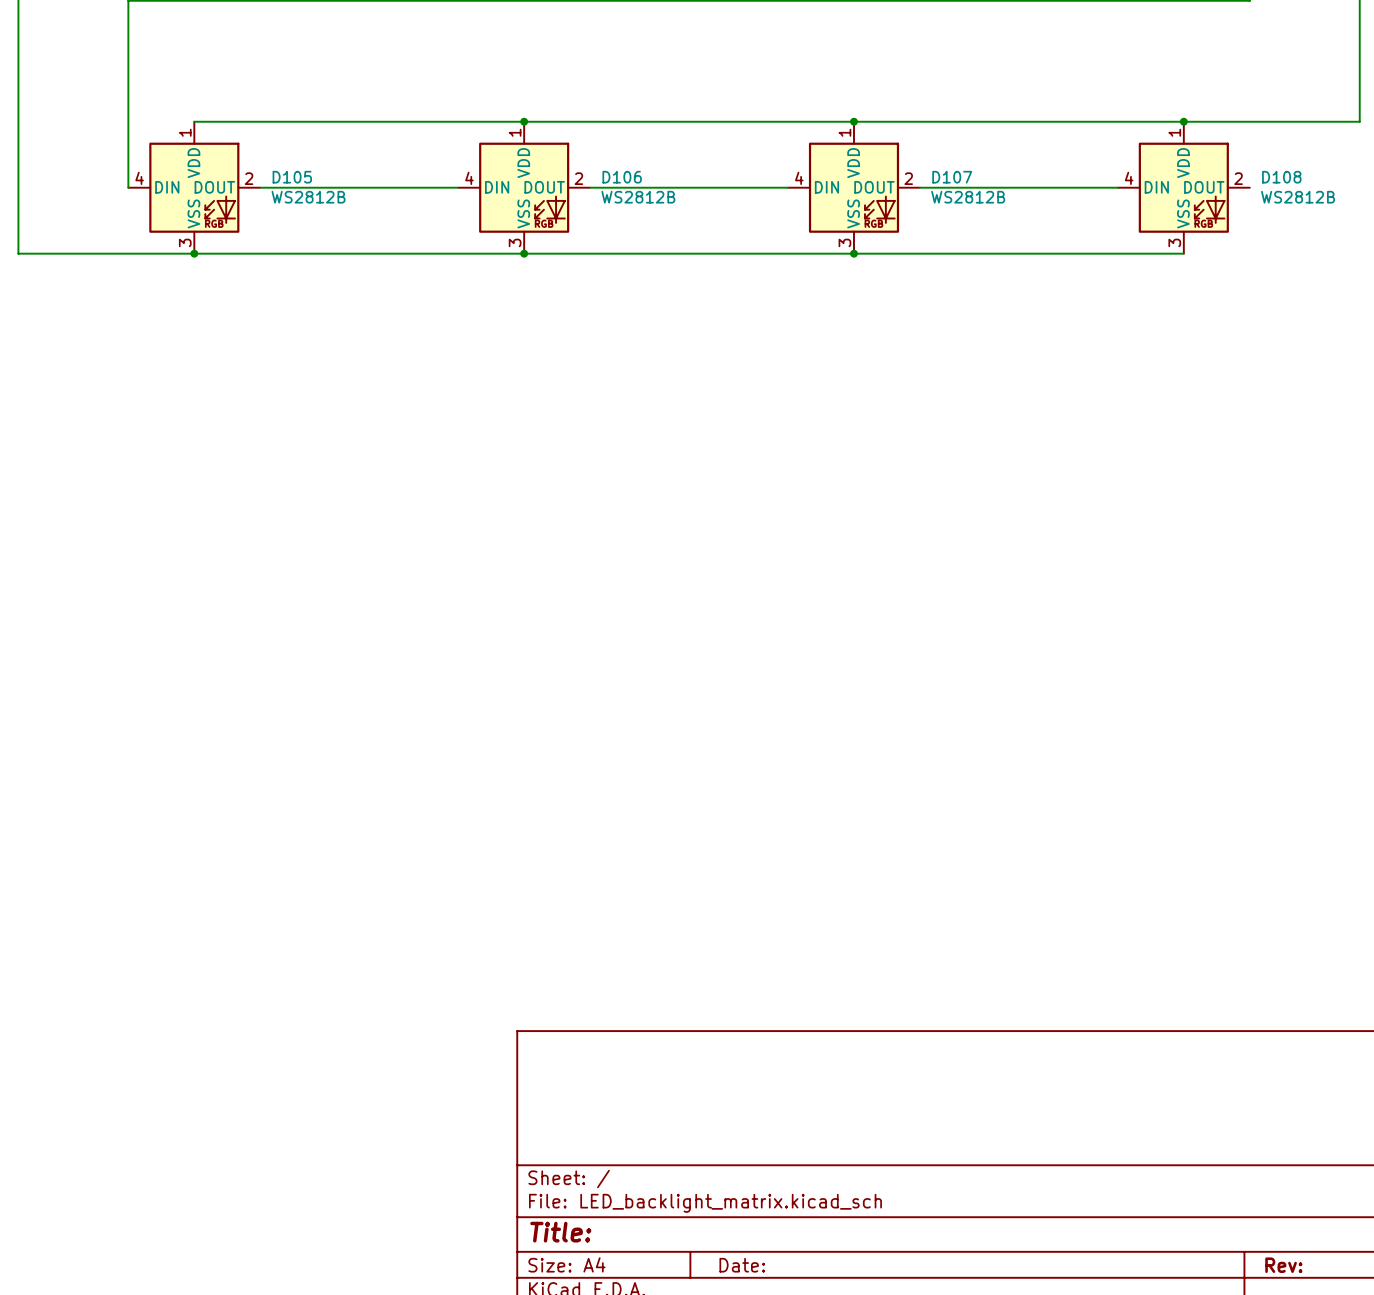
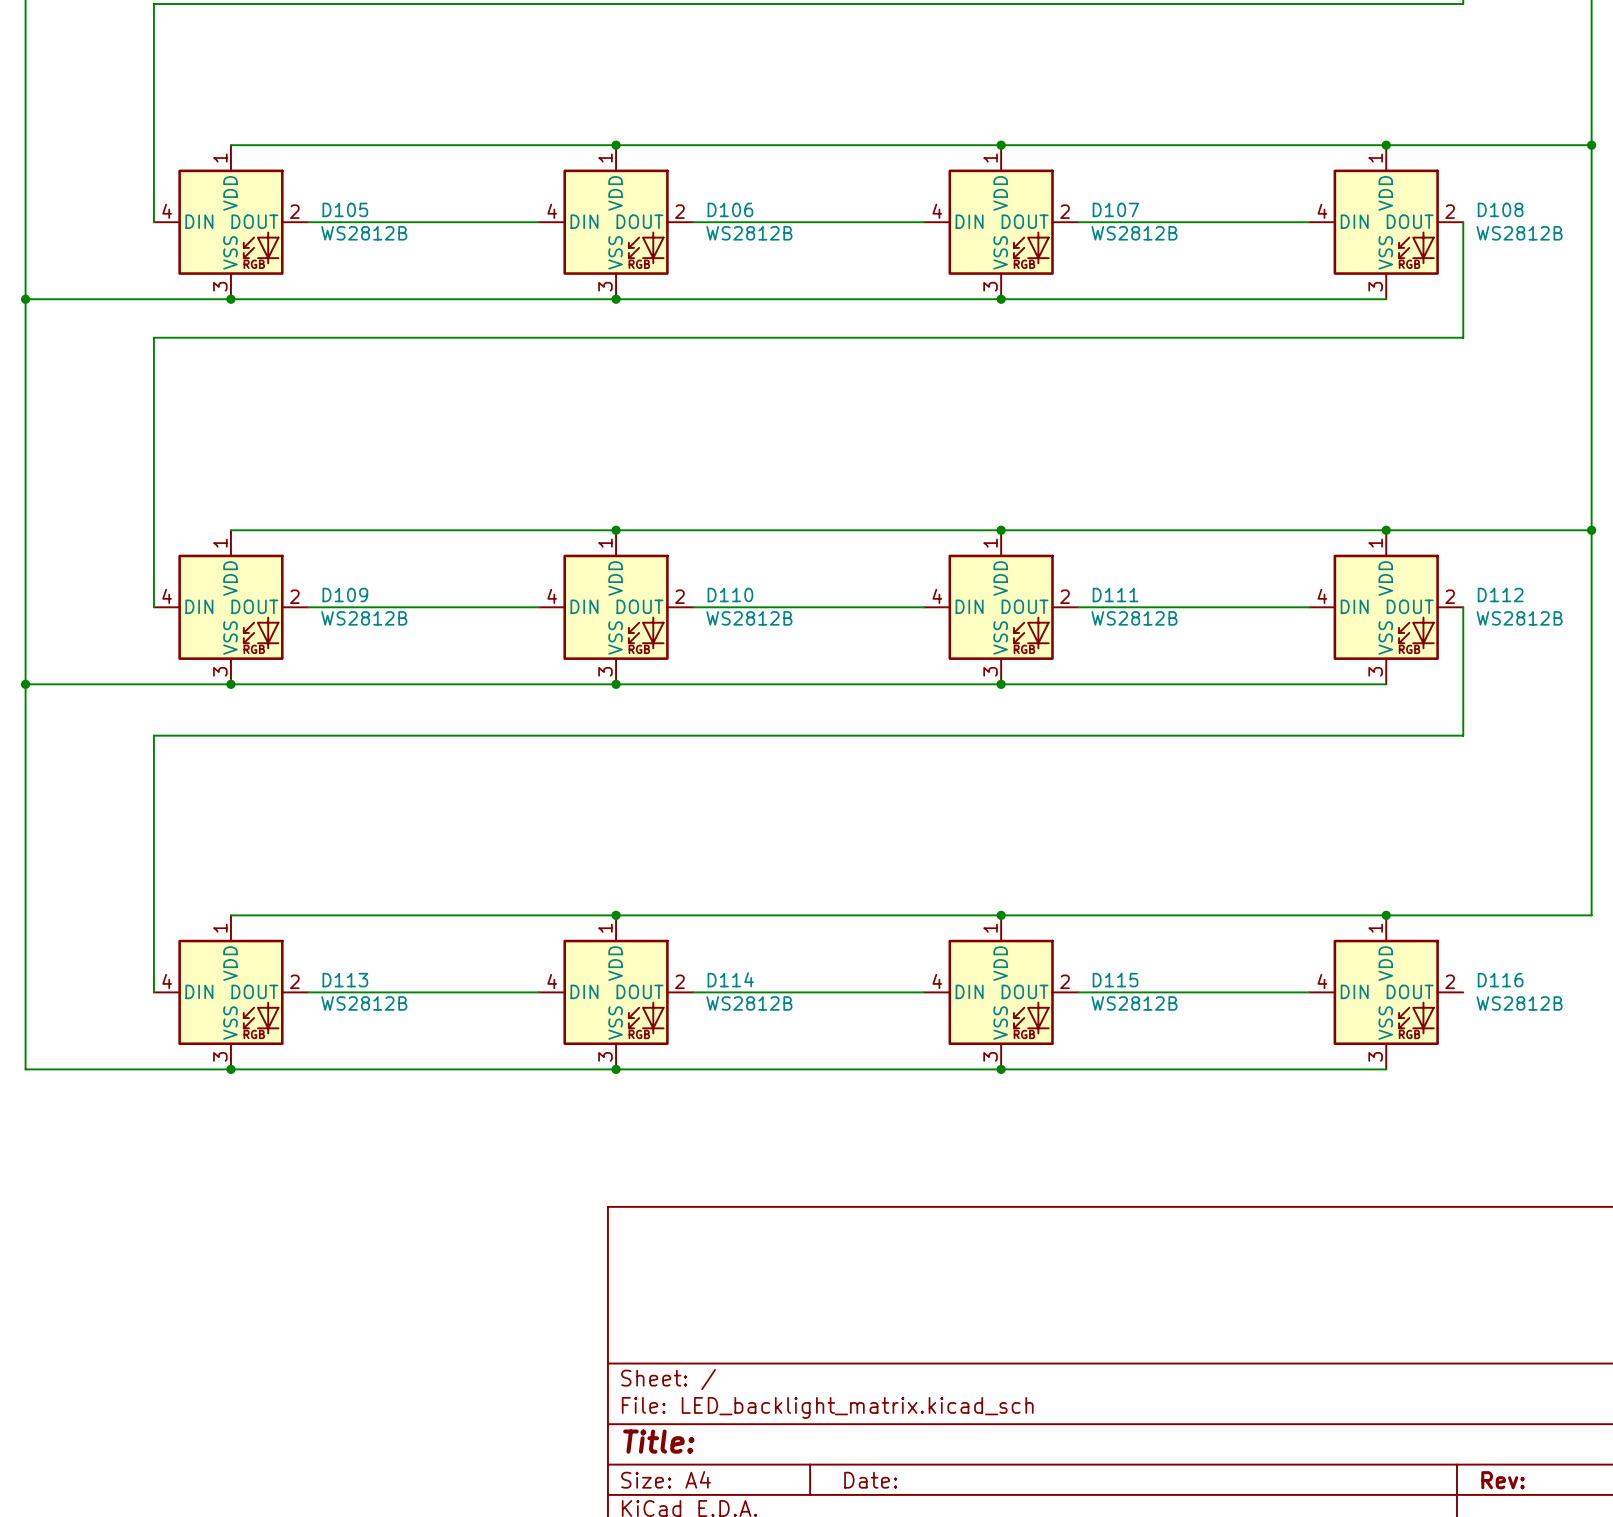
wire: none -> (1591, 145) (1591, 915) (230, 915)
junction: none -> (1591, 145)
wire: none -> (1463, 222) (1463, 337) (153, 337) (153, 607)
wire: none -> (25, 299) (25, 1069) (1386, 1069)
junction: none -> (25, 299)
wire: none -> (230, 530) (1591, 530)
junction: none -> (616, 530)
junction: none -> (1001, 530)
junction: none -> (1386, 530)
junction: none -> (1591, 530)
D109: none -> WS2812B (230, 607)
wire: none -> (307, 607) (539, 607)
D110: none -> WS2812B (616, 607)
wire: none -> (693, 607) (924, 607)
D111: none -> WS2812B (1001, 607)
wire: none -> (1078, 607) (1309, 607)
D112: none -> WS2812B (1386, 607)
wire: none -> (1463, 607) (1463, 735) (153, 735) (153, 992)
wire: none -> (25, 684) (1386, 684)
junction: none -> (25, 684)
junction: none -> (230, 684)
junction: none -> (616, 684)
junction: none -> (1001, 684)
junction: none -> (616, 915)
junction: none -> (1001, 915)
junction: none -> (1386, 915)
D113: none -> WS2812B (230, 992)
wire: none -> (307, 992) (539, 992)
D114: none -> WS2812B (616, 992)
wire: none -> (693, 992) (924, 992)
D115: none -> WS2812B (1001, 992)
wire: none -> (1078, 992) (1309, 992)
D116: none -> WS2812B (1386, 992)
junction: none -> (230, 1069)
junction: none -> (616, 1069)
junction: none -> (1001, 1069)

